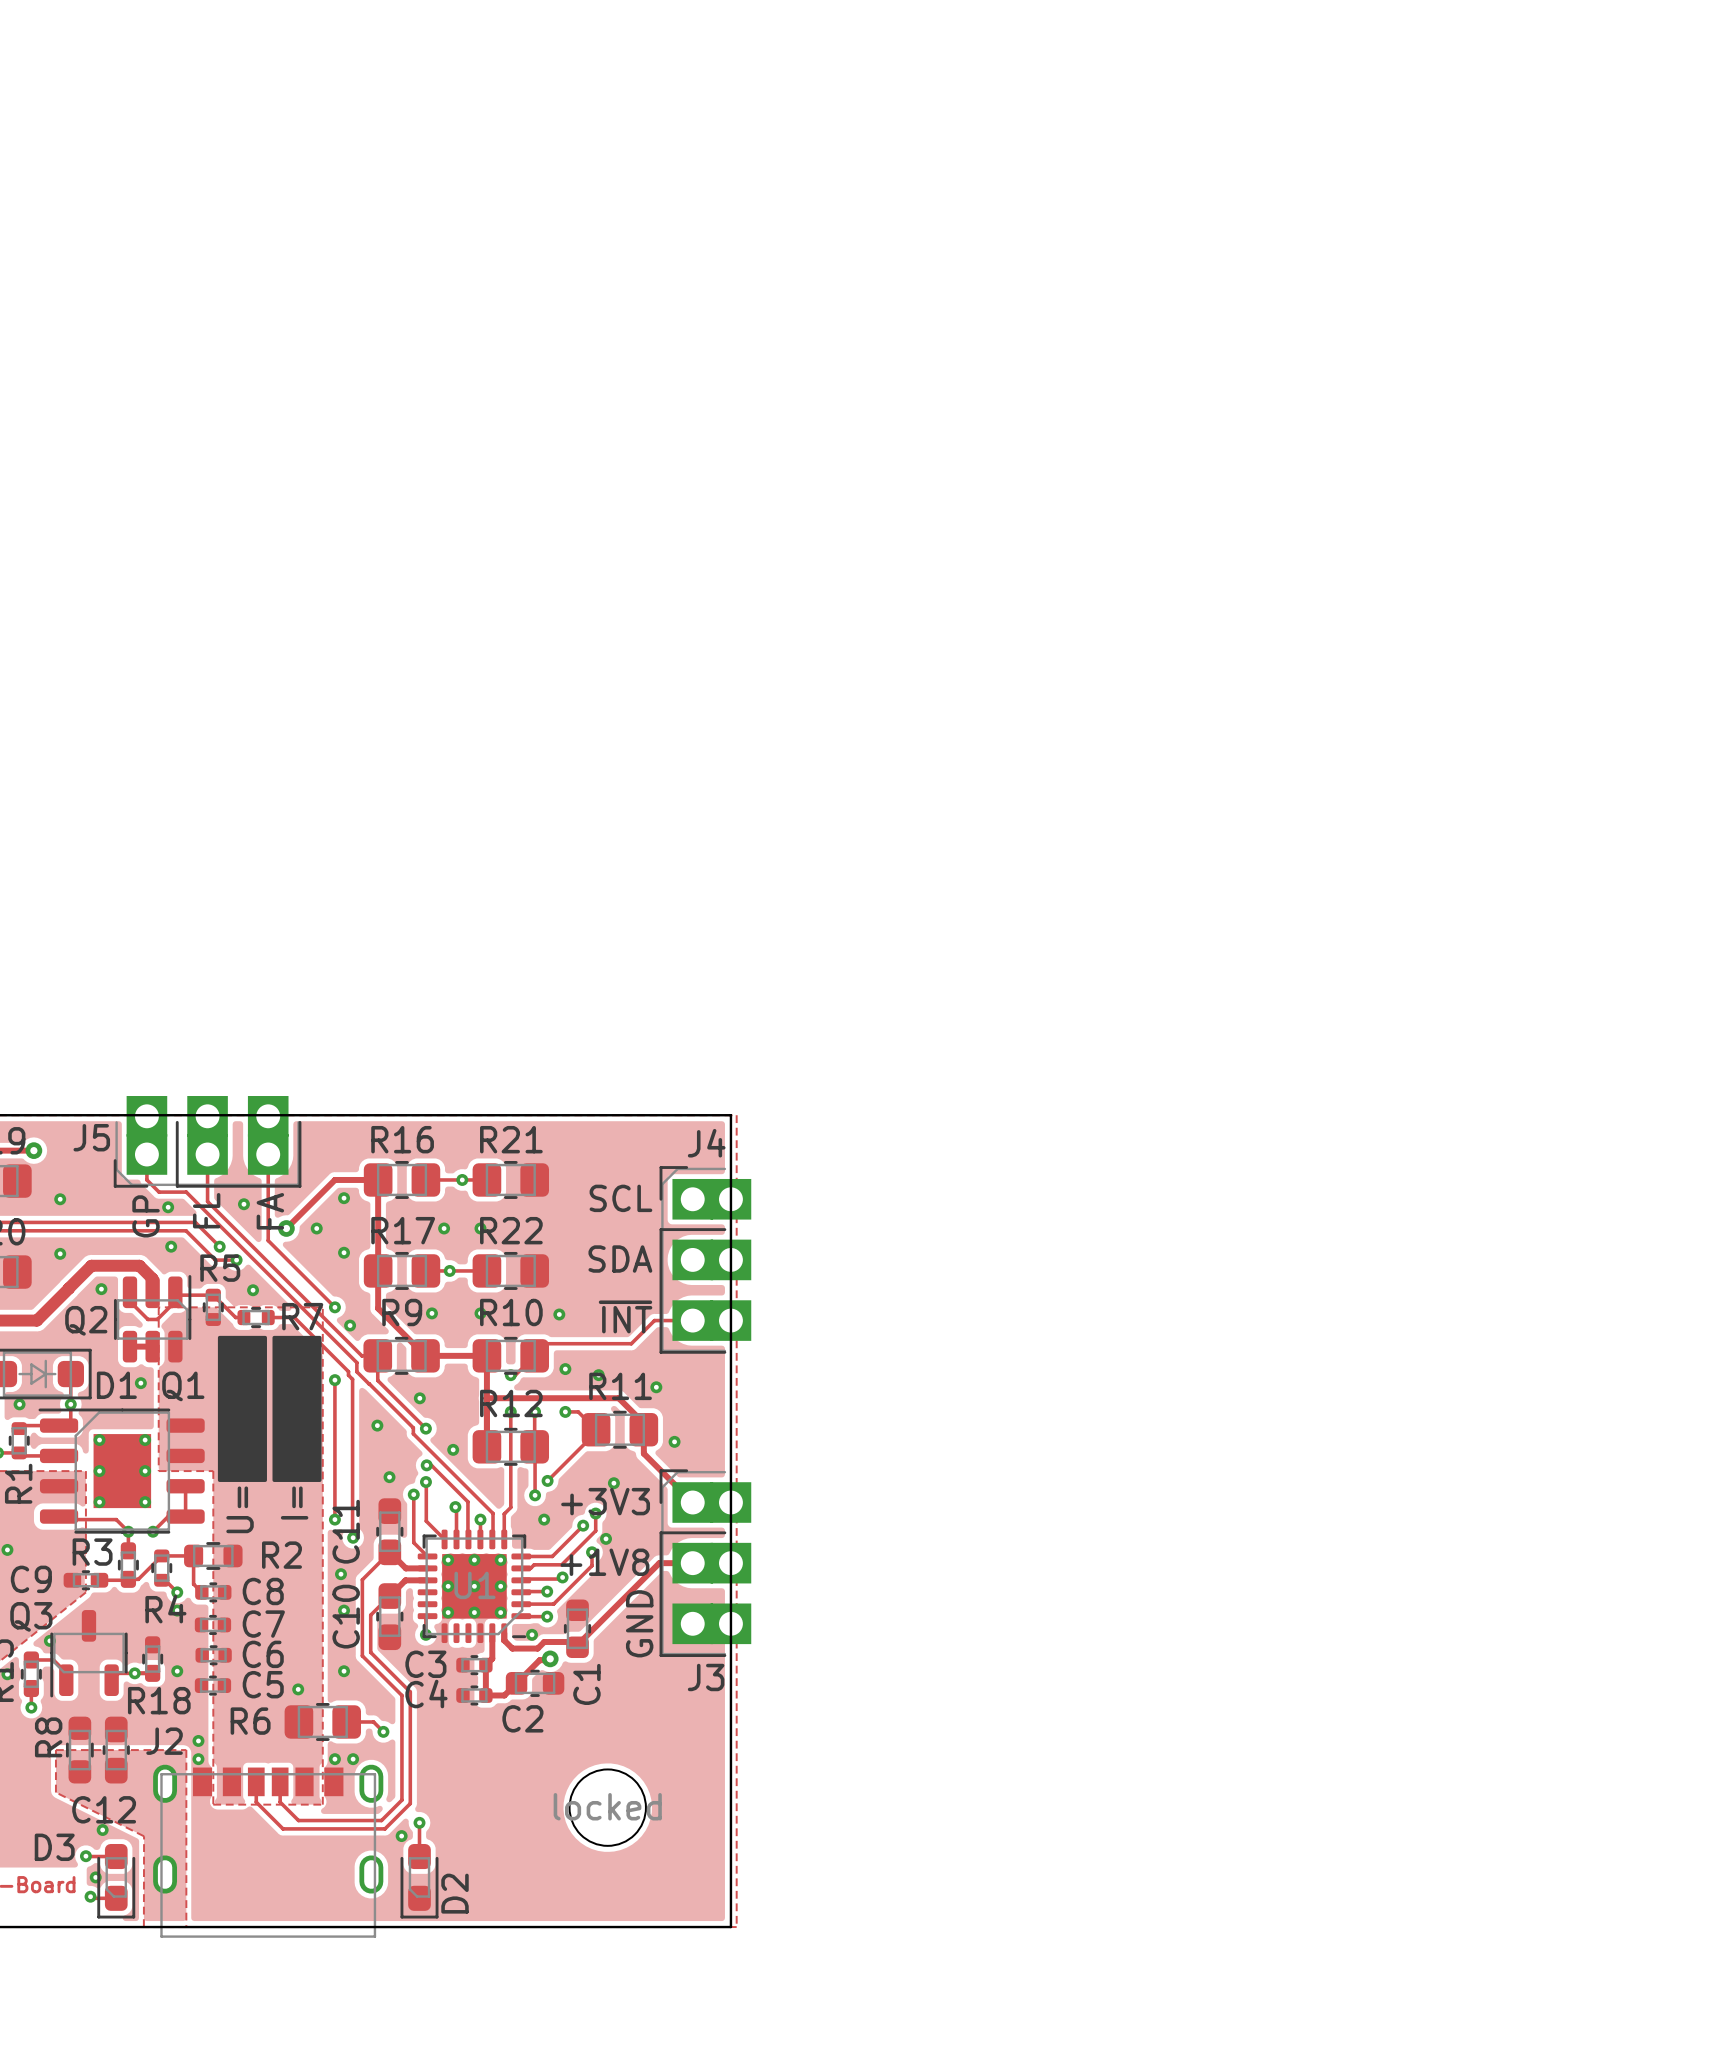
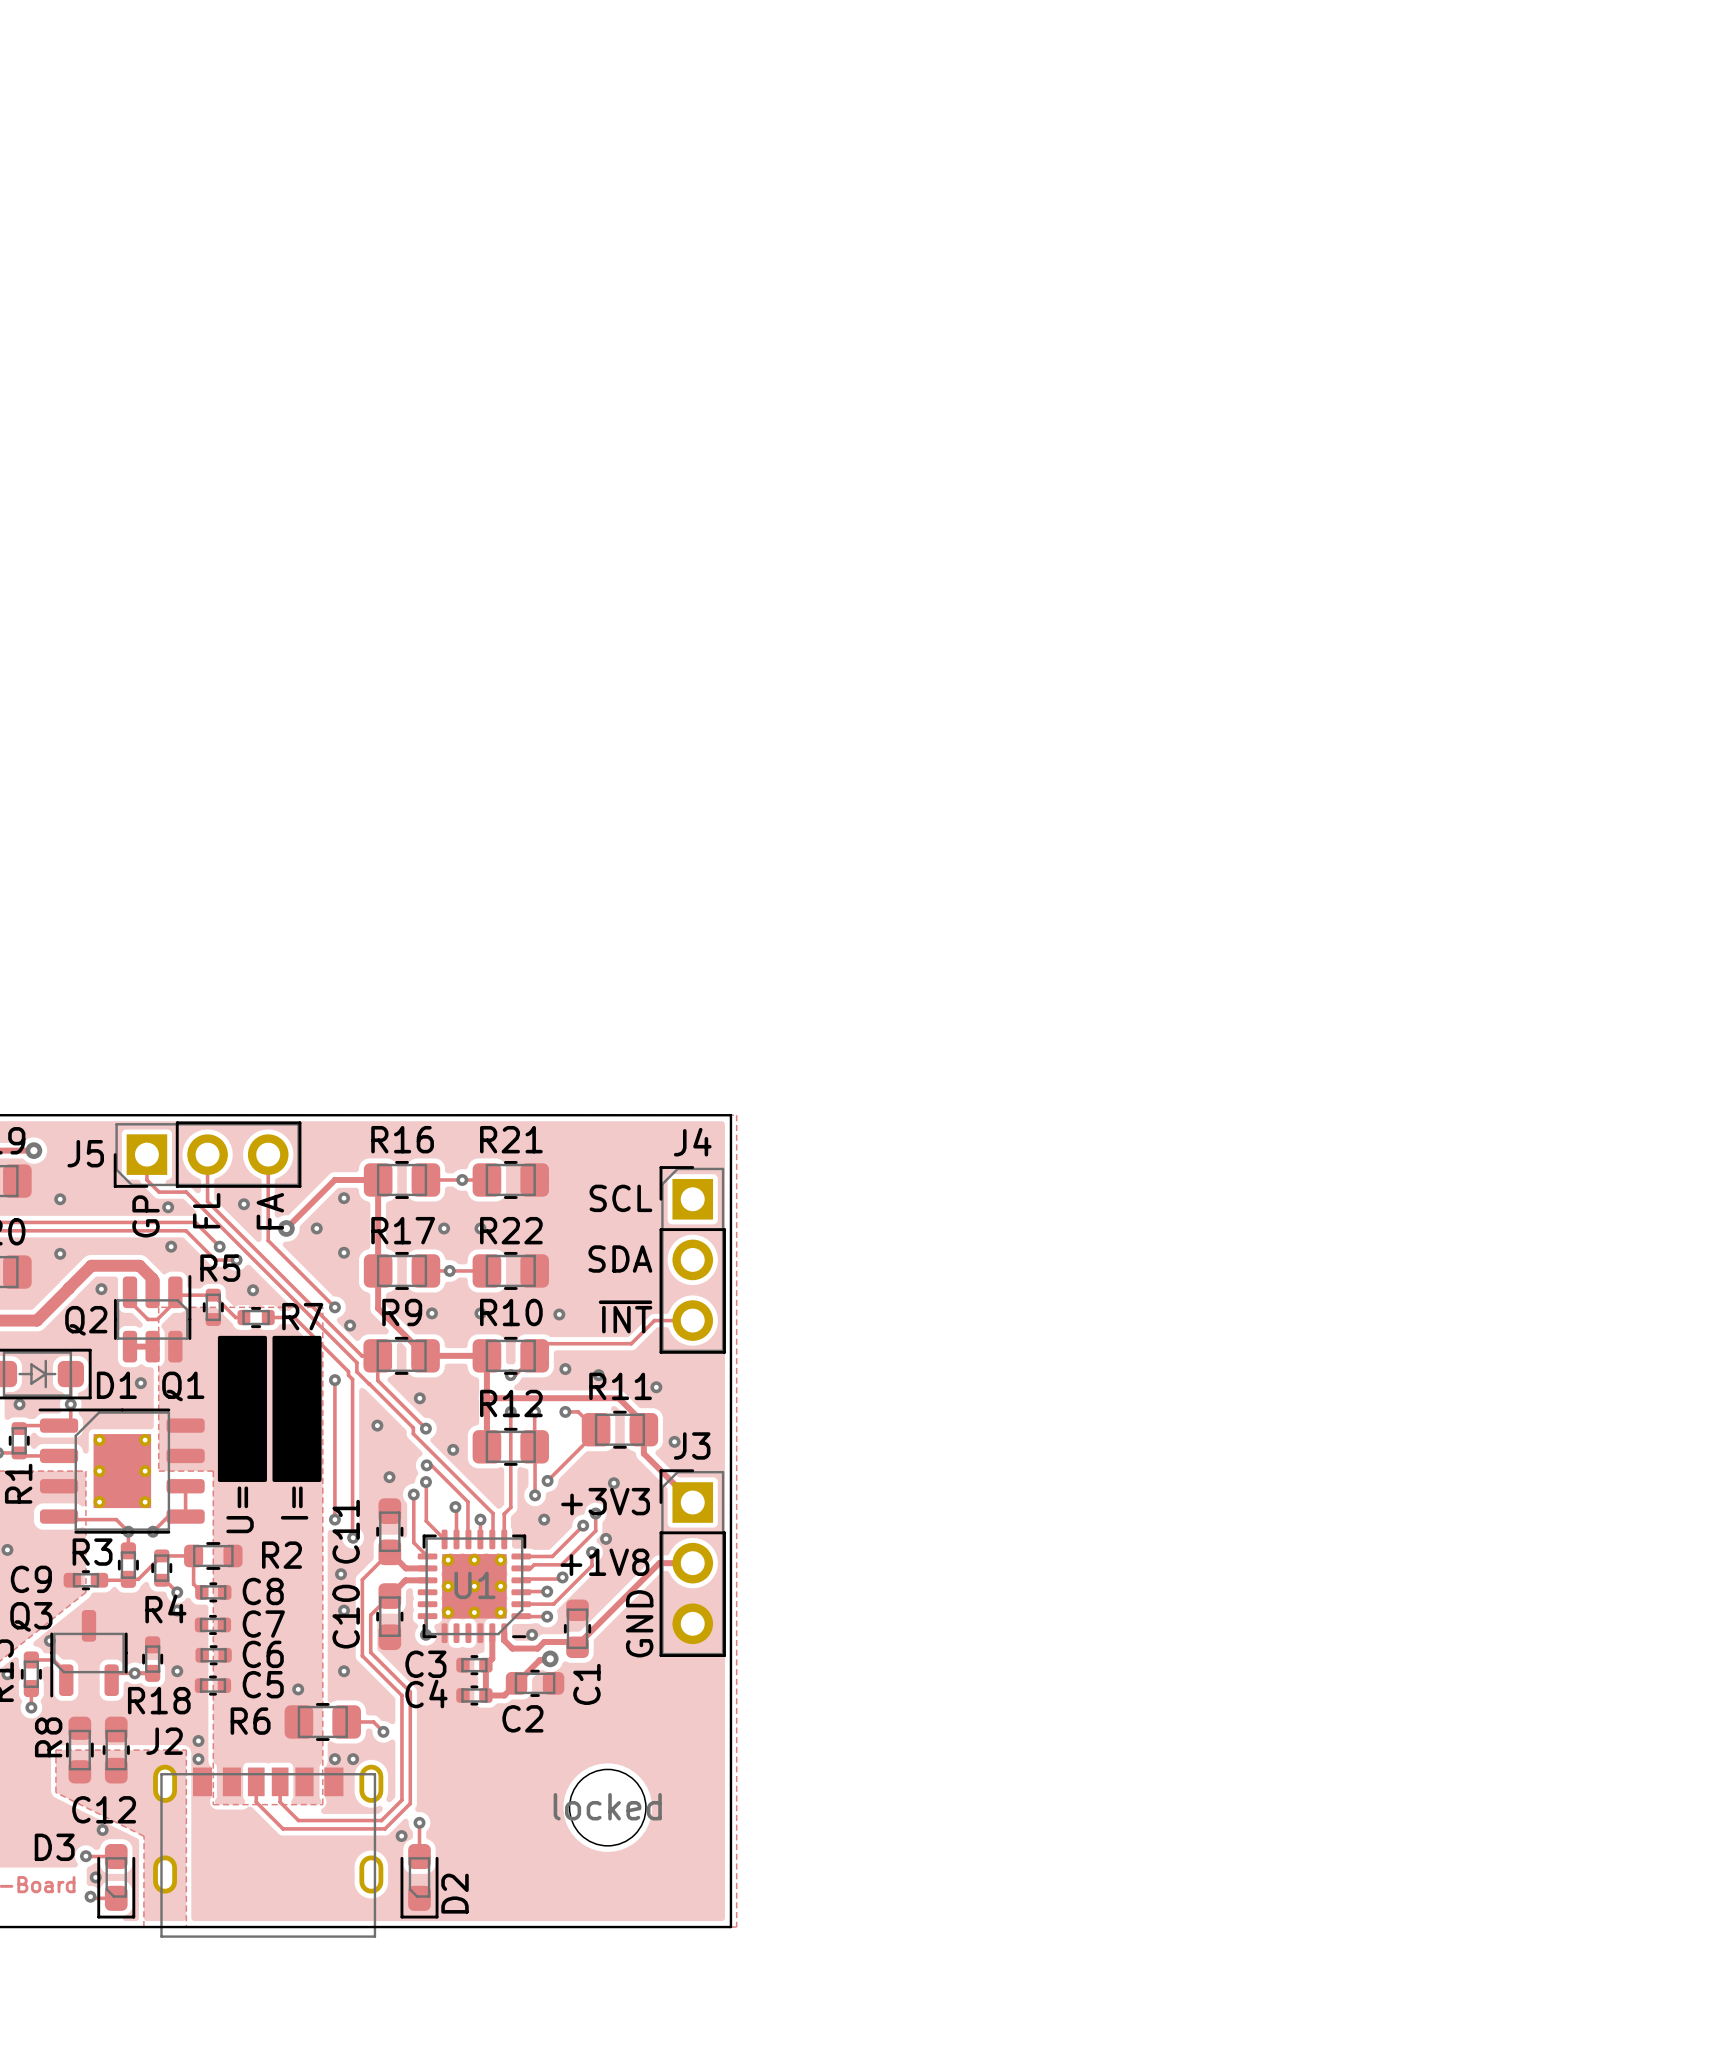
J5 footprint: [113, 1096, 302, 1188] -> [113, 1121, 302, 1188]
J4 footprint: [659, 1166, 752, 1354] -> [659, 1166, 726, 1354]
J3 footprint: [659, 1469, 752, 1657] -> [659, 1469, 726, 1657]
J3 name position: J3 (706, 1677) -> J3 (692, 1445)

